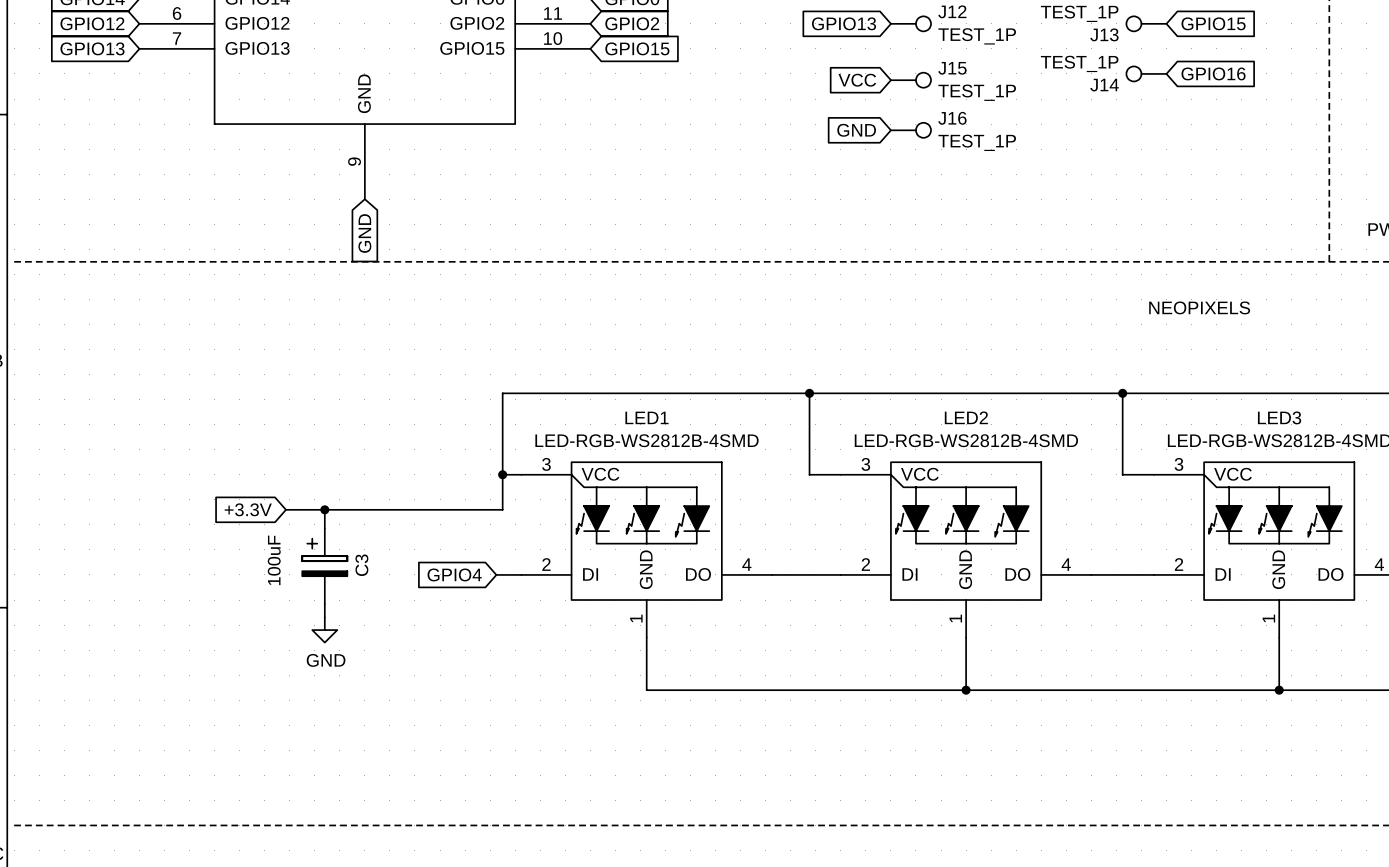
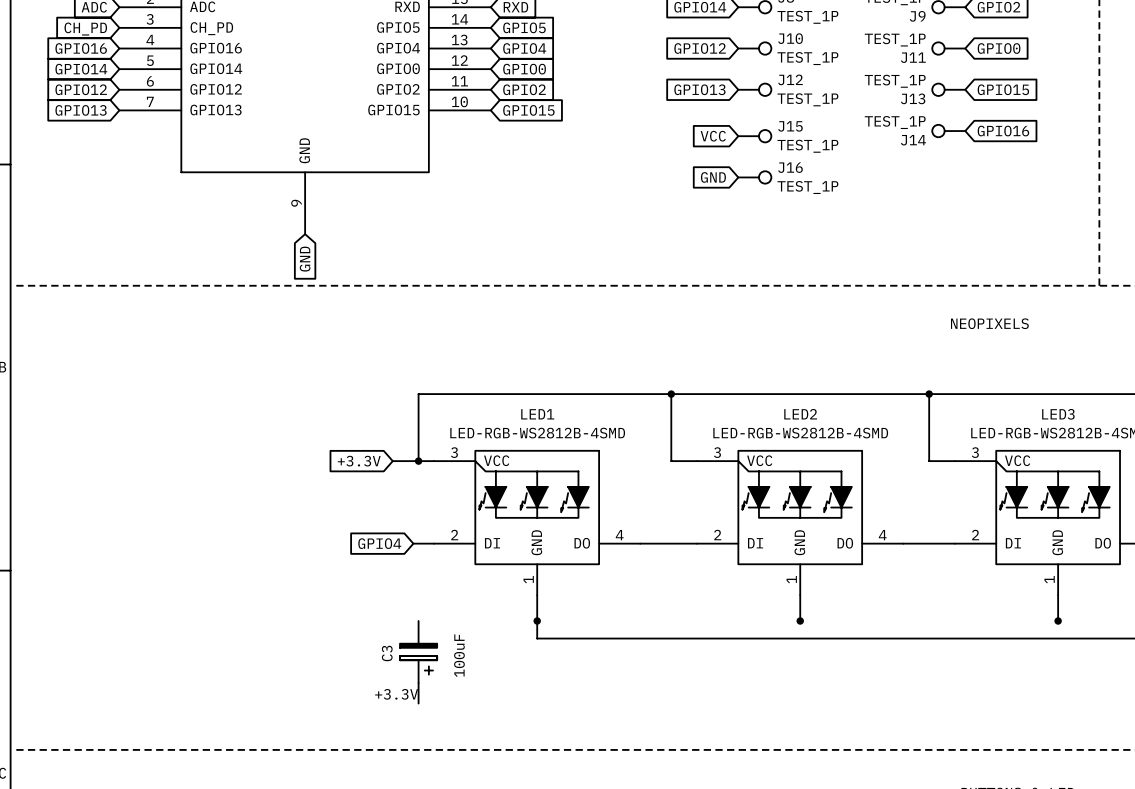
wire: (502, 474) (502, 509) (285, 509) -> (418, 461) (392, 461)
global label position: +3.3V (248, 509) -> +3.3V (359, 461)
wire: (324, 509) (324, 528) -> none
junction: (324, 509) -> none
C3 rotation: 0° (324, 557) -> 180° (418, 659)
C3 position: (324, 566) -> (418, 651)
wire: (324, 603) (324, 617) -> none
power symbol: GND (324, 630) -> none
junction: none -> (537, 621)
wire: (966, 668) (966, 690) -> none
wire: (1279, 668) (1279, 690) -> none
junction position: (966, 690) -> (800, 621)
junction position: (1279, 690) -> (1058, 621)
wire: none -> (418, 682) (418, 703)
label: none -> +3.3V (396, 694)

